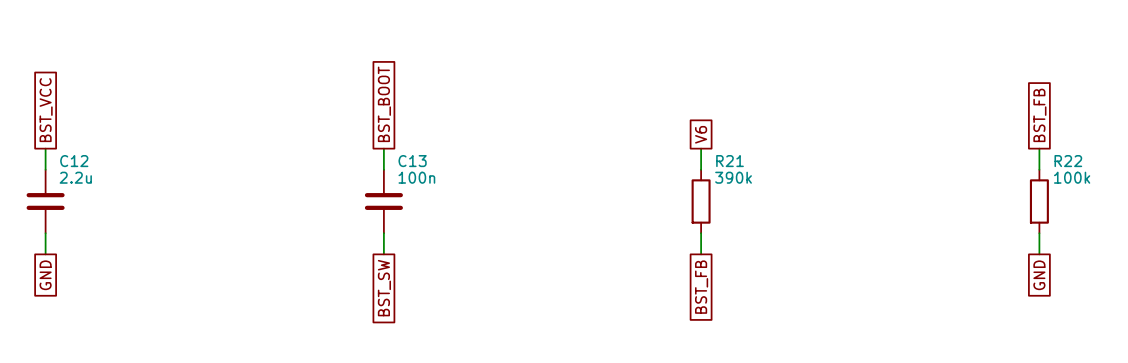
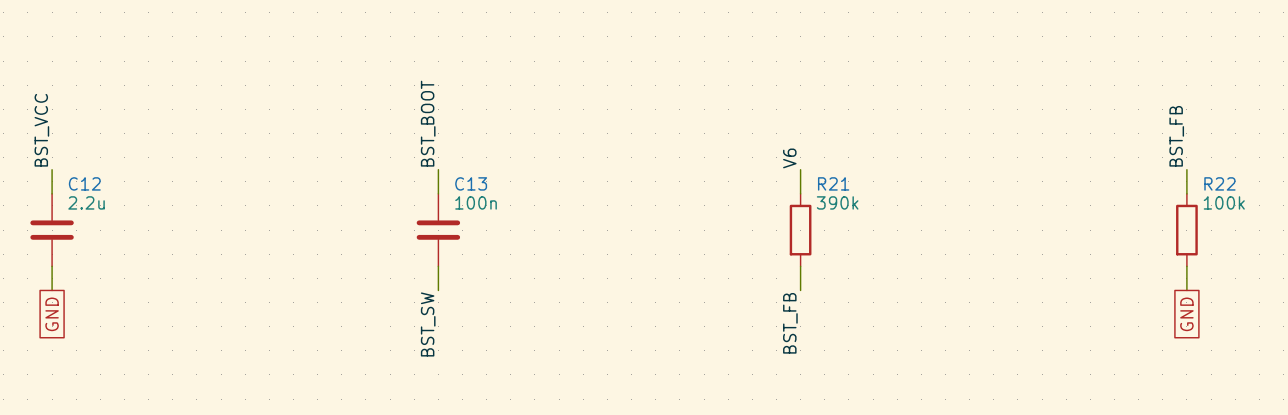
global label: BST_BOOT (384, 104) -> none
label: none -> BST_BOOT (428, 123)
global label: BST_VCC (46, 110) -> none
label: none -> BST_VCC (41, 130)
global label: BST_FB (1039, 115) -> none
label: none -> BST_FB (1176, 136)
global label: V6 (701, 134) -> none
label: none -> V6 (789, 158)
label: none -> BST_FB (790, 323)
label: none -> BST_SW (428, 324)
global label: BST_FB (701, 287) -> none
global label: BST_SW (384, 288) -> none

